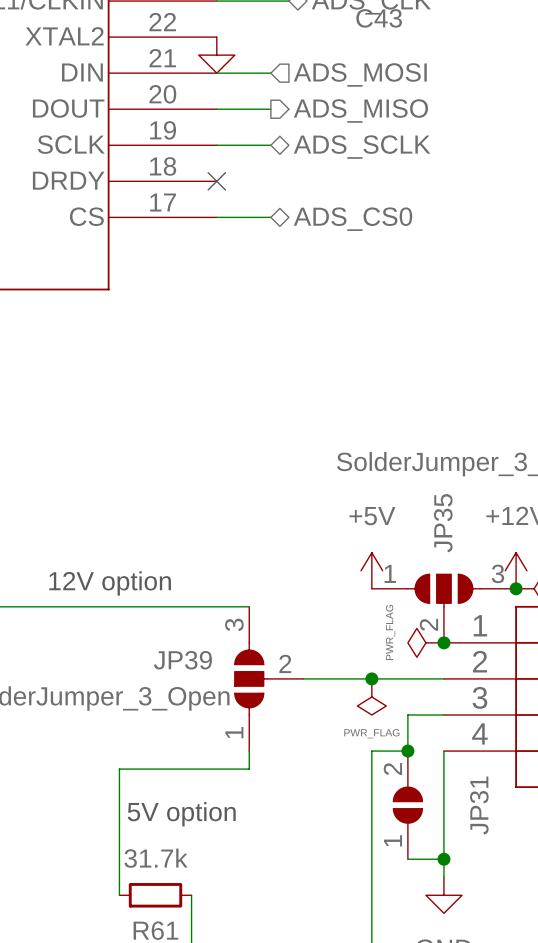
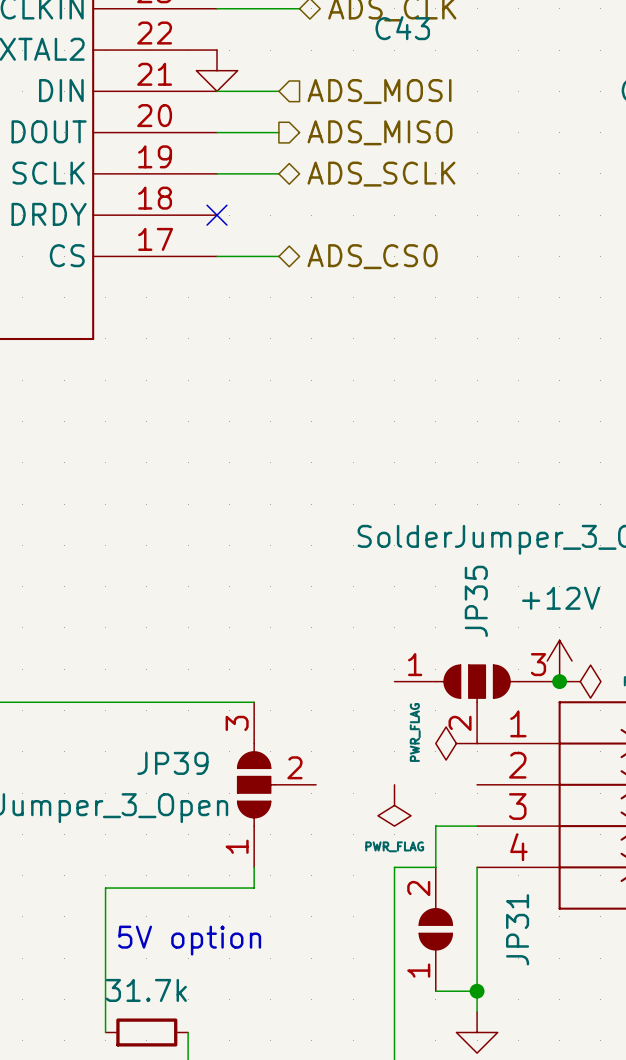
power symbol: +5V (371, 570) -> none
text: 12V option (110, 583) -> none
junction: (443, 642) -> none
wire: (303, 678) (443, 678) -> none
junction: (371, 678) -> none
junction: (407, 751) -> none

